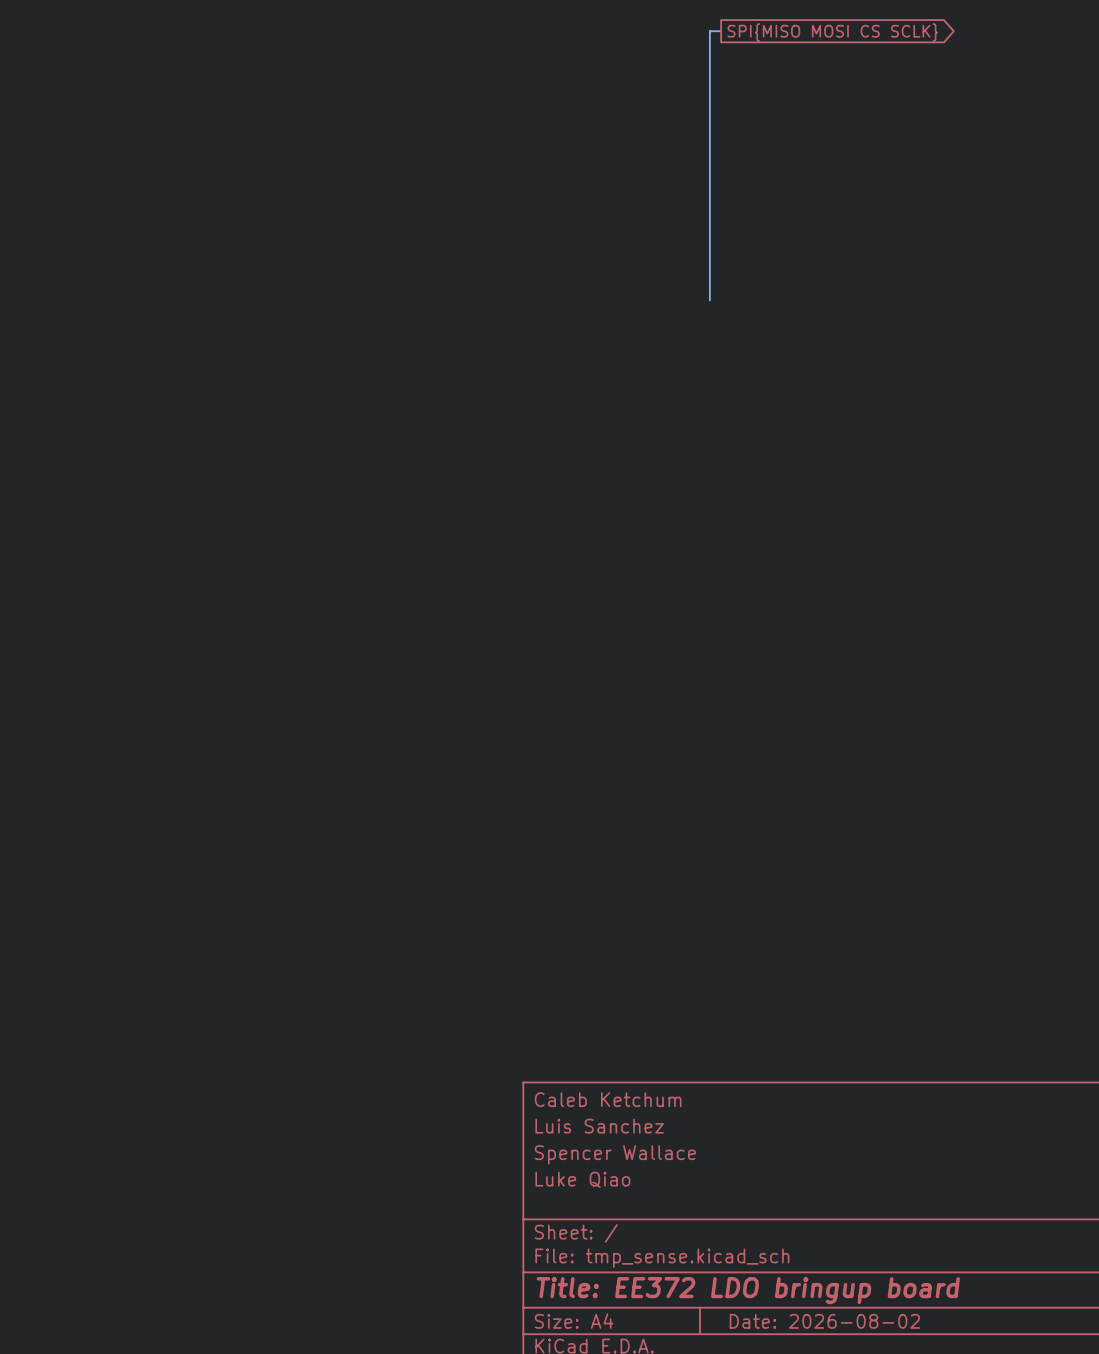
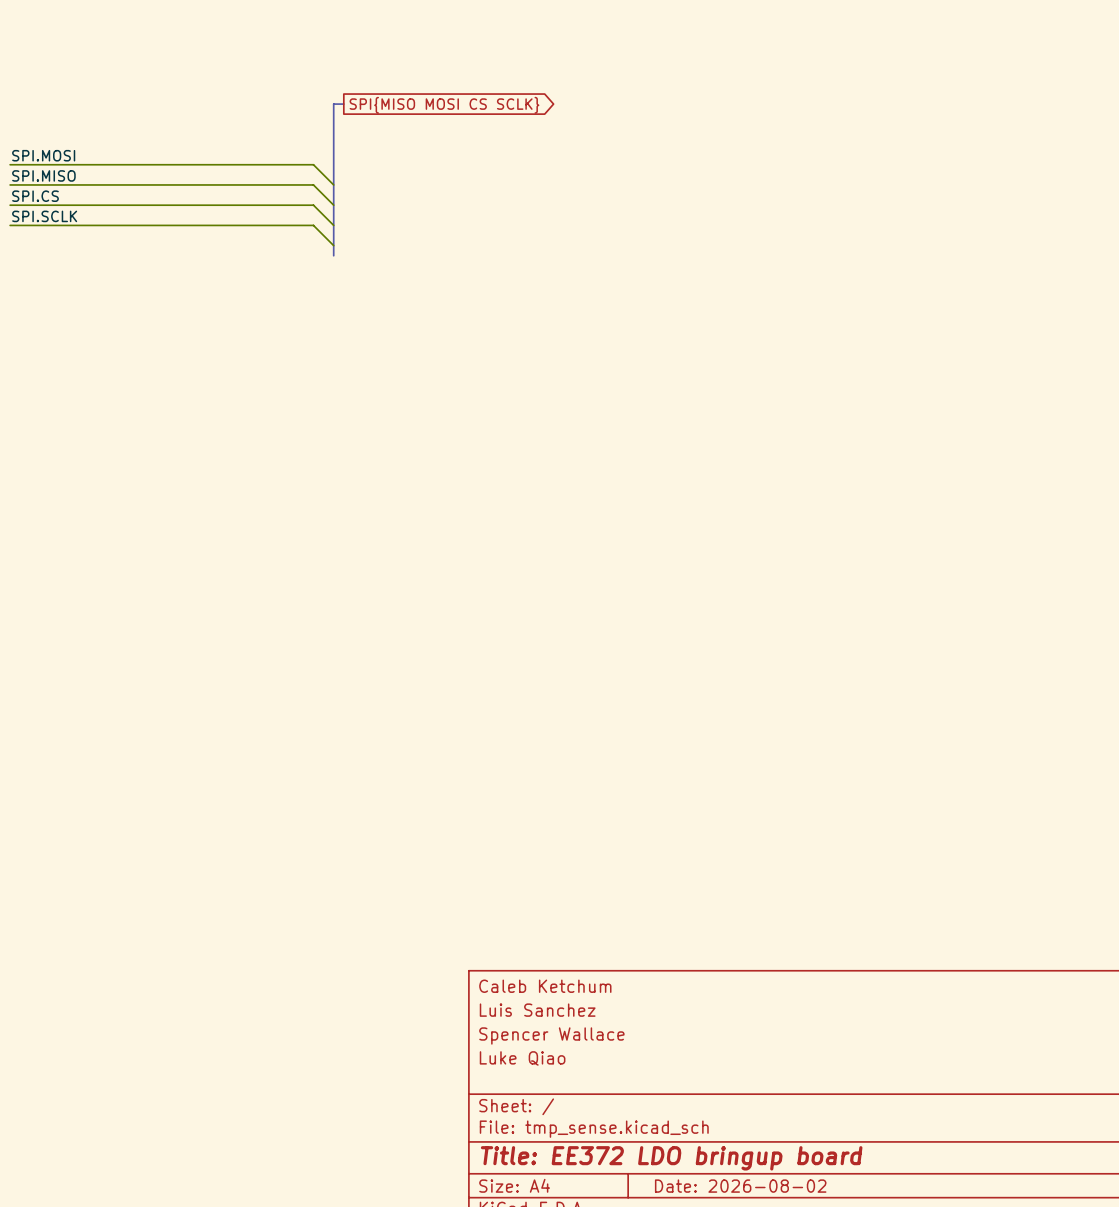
bus: (721, 31) (709, 31) (709, 300) -> none
global label: SPI{MISO MOSI CS SCLK} (832, 32) -> none
bus: none -> (343, 104) (333, 104) (333, 255)
global label: none -> SPI{MISO MOSI CS SCLK} (444, 105)
label: none -> SPI.MOSI (43, 155)
wire: none -> (10, 164) (313, 164) (333, 184)
label: none -> SPI.MISO (43, 175)
wire: none -> (10, 184) (313, 184) (333, 205)
label: none -> SPI.CS (35, 196)
wire: none -> (10, 205) (313, 205) (333, 225)
label: none -> SPI.SCLK (44, 216)
wire: none -> (10, 225) (313, 225) (333, 245)

